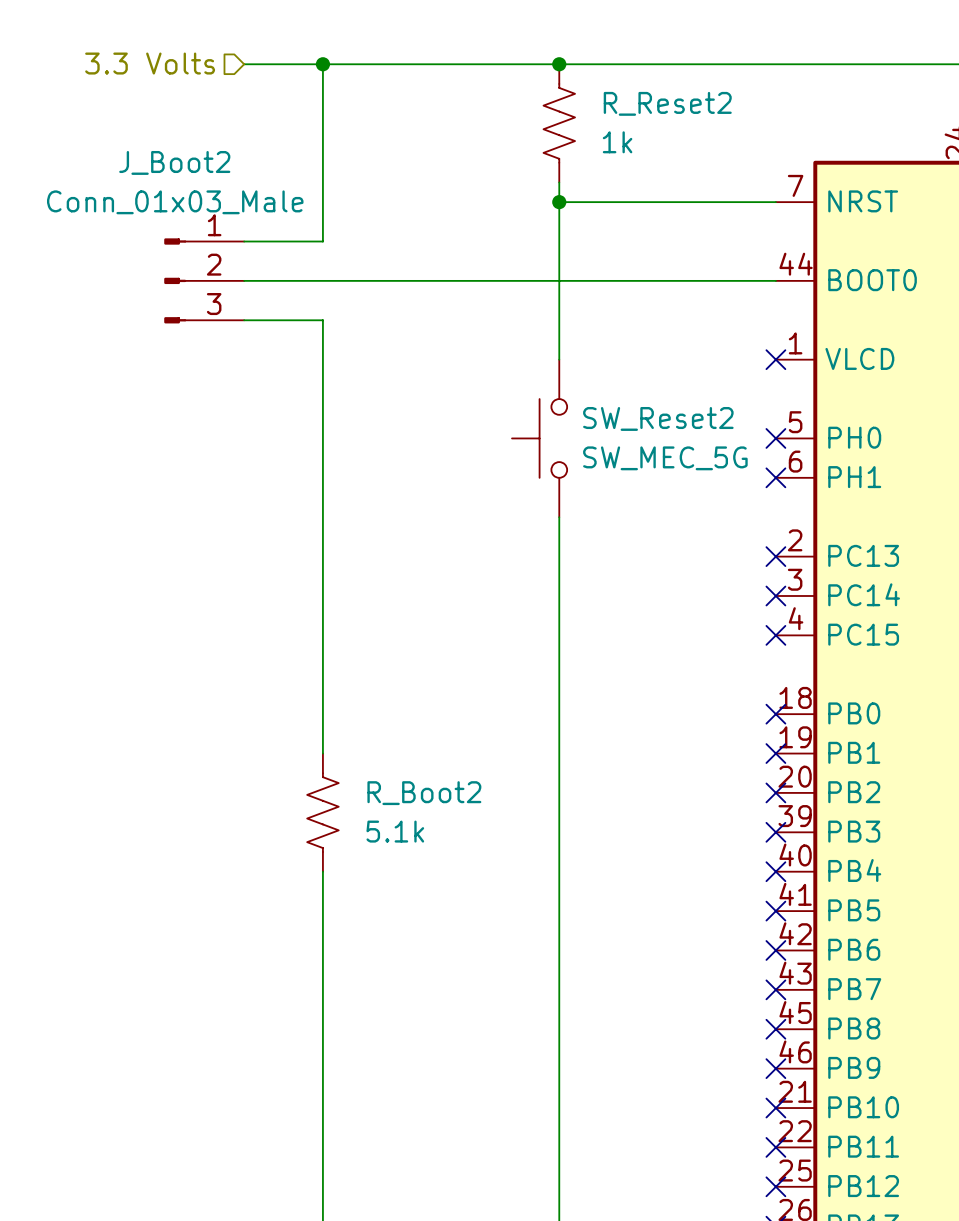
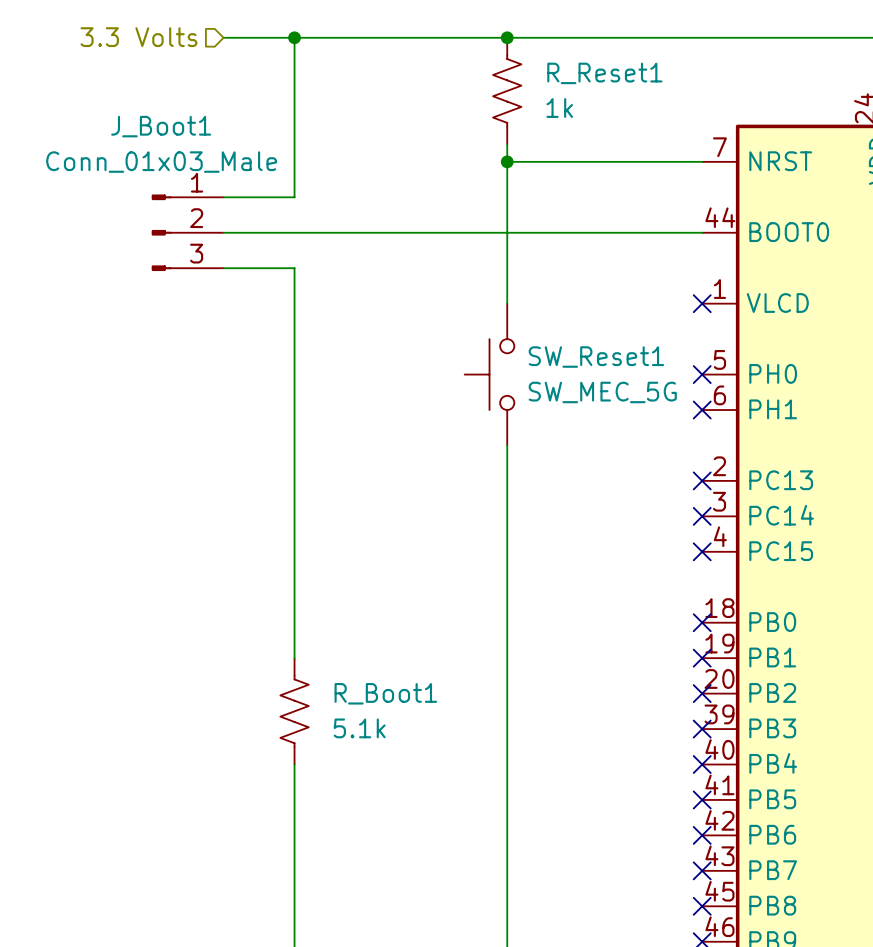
R_Reset2 name: R_Reset2 (667, 103) -> R_Reset1 (604, 73)
J_Boot2 name: J_Boot2 (174, 162) -> J_Boot1 (161, 126)
SW_Reset2 name: SW_Reset2 (658, 418) -> SW_Reset1 (596, 357)
R_Boot2 name: R_Boot2 (424, 793) -> R_Boot1 (385, 693)

